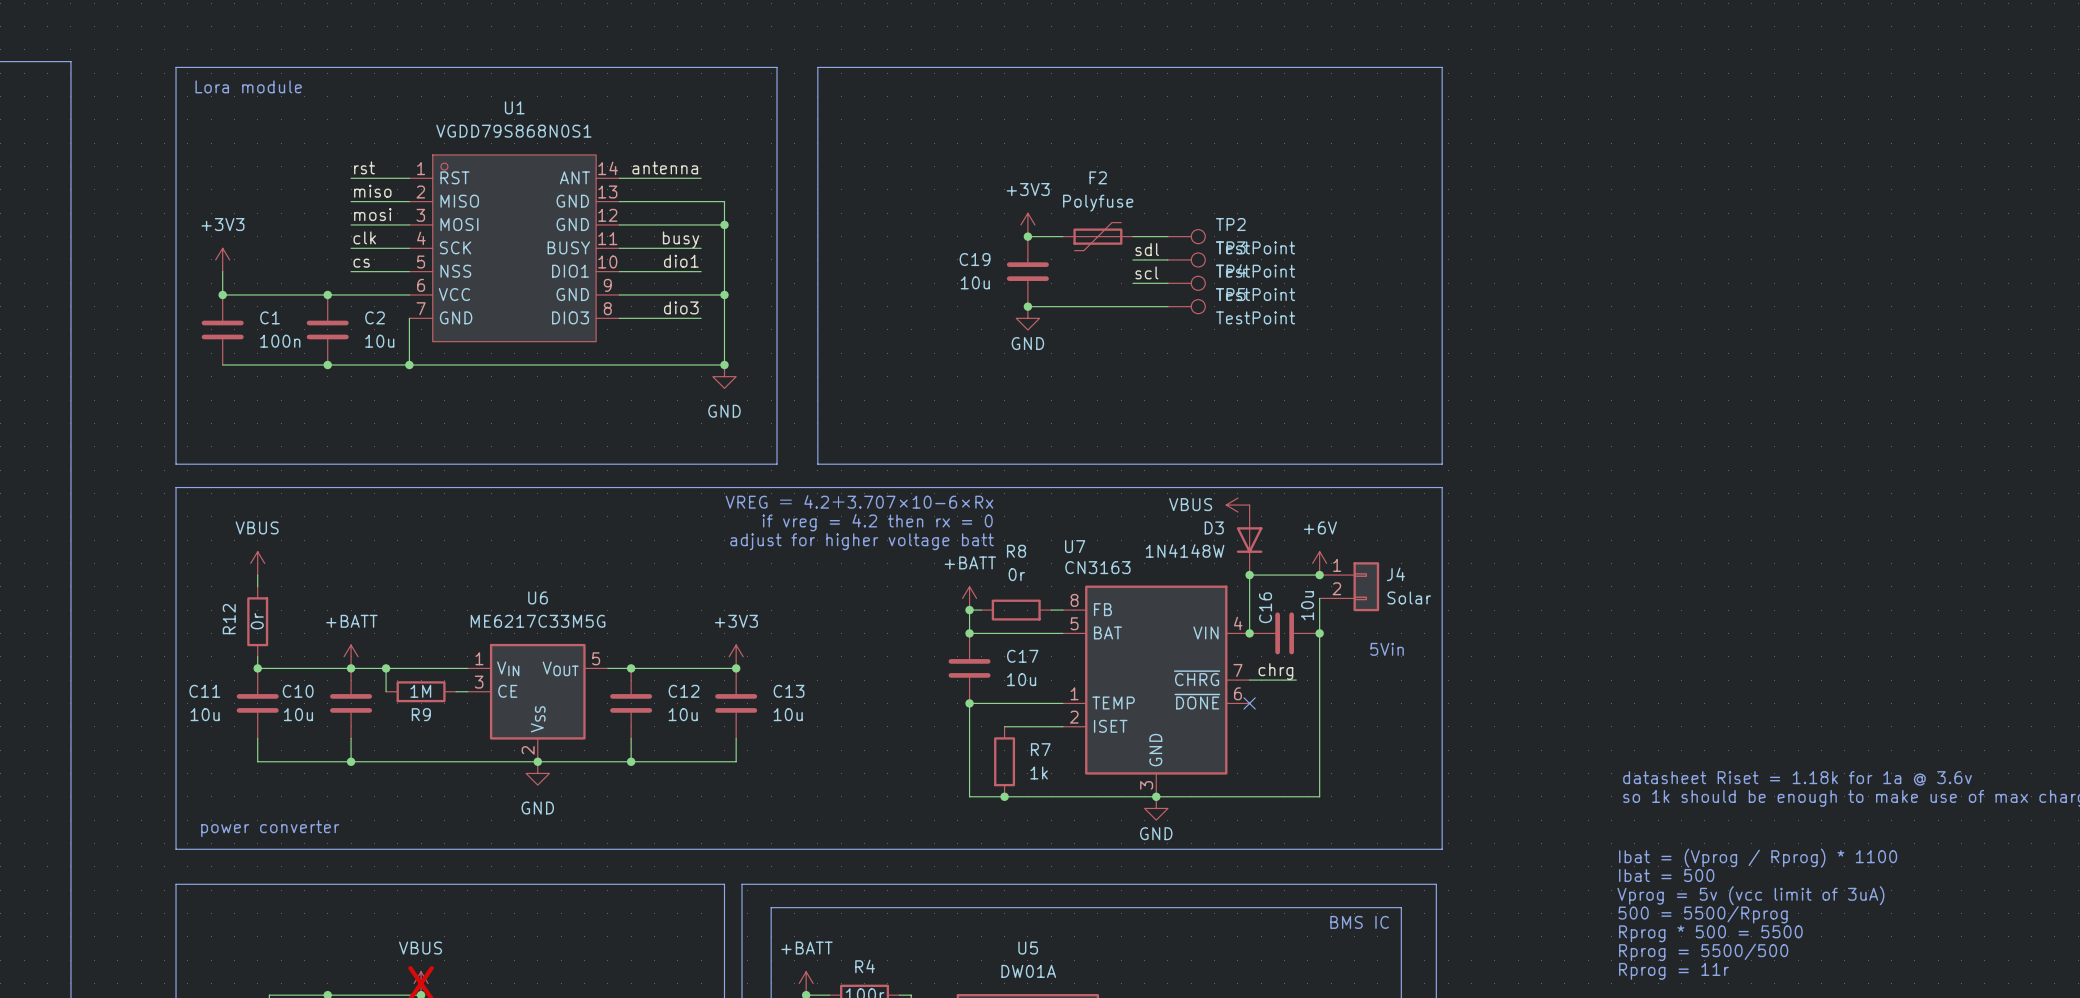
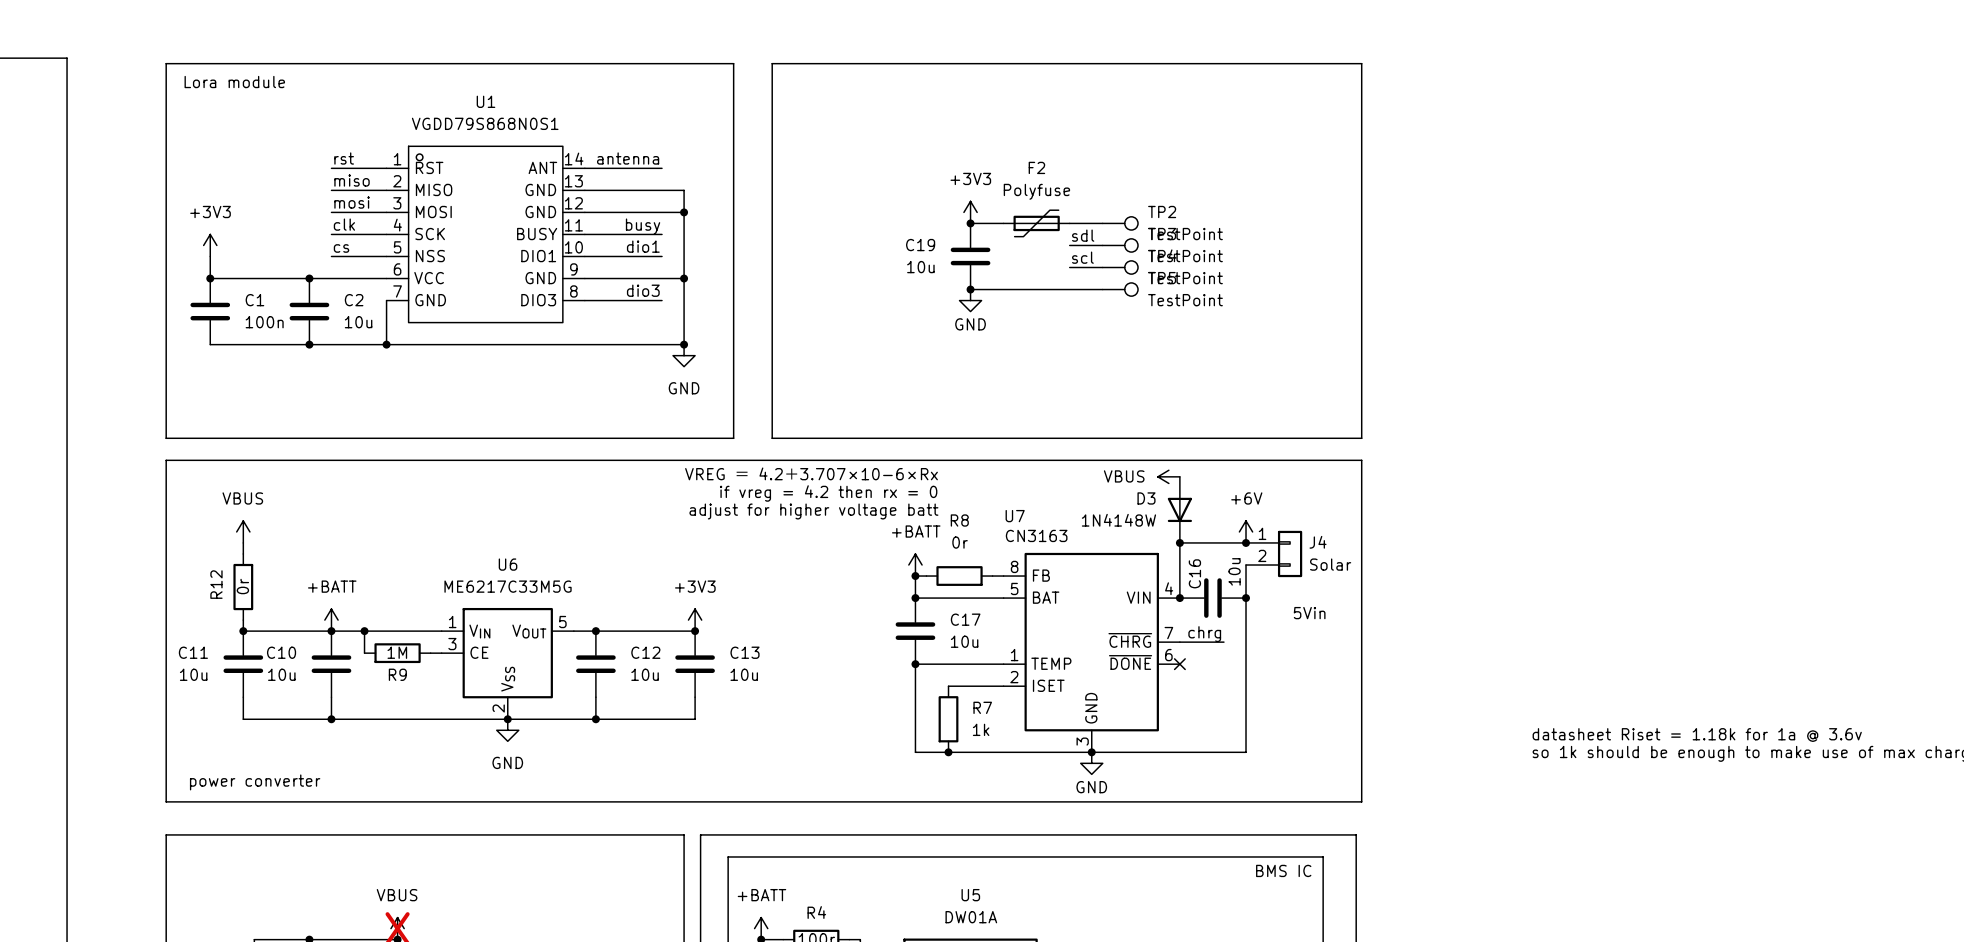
text: Ibat = (Vprog / Rprog) * 1100 (1758, 858) -> none
text: Ibat = 500 (1666, 875) -> none
text: Vprog = 5v (vcc limit of 3uA) (1750, 895) -> none
text: 500 = 5500/Rprog (1703, 914) -> none
text: Rprog * 500 = 5500 (1710, 933) -> none
text: Rprog = 5500/500 (1703, 952) -> none
text: Rprog = 11r (1673, 971) -> none

